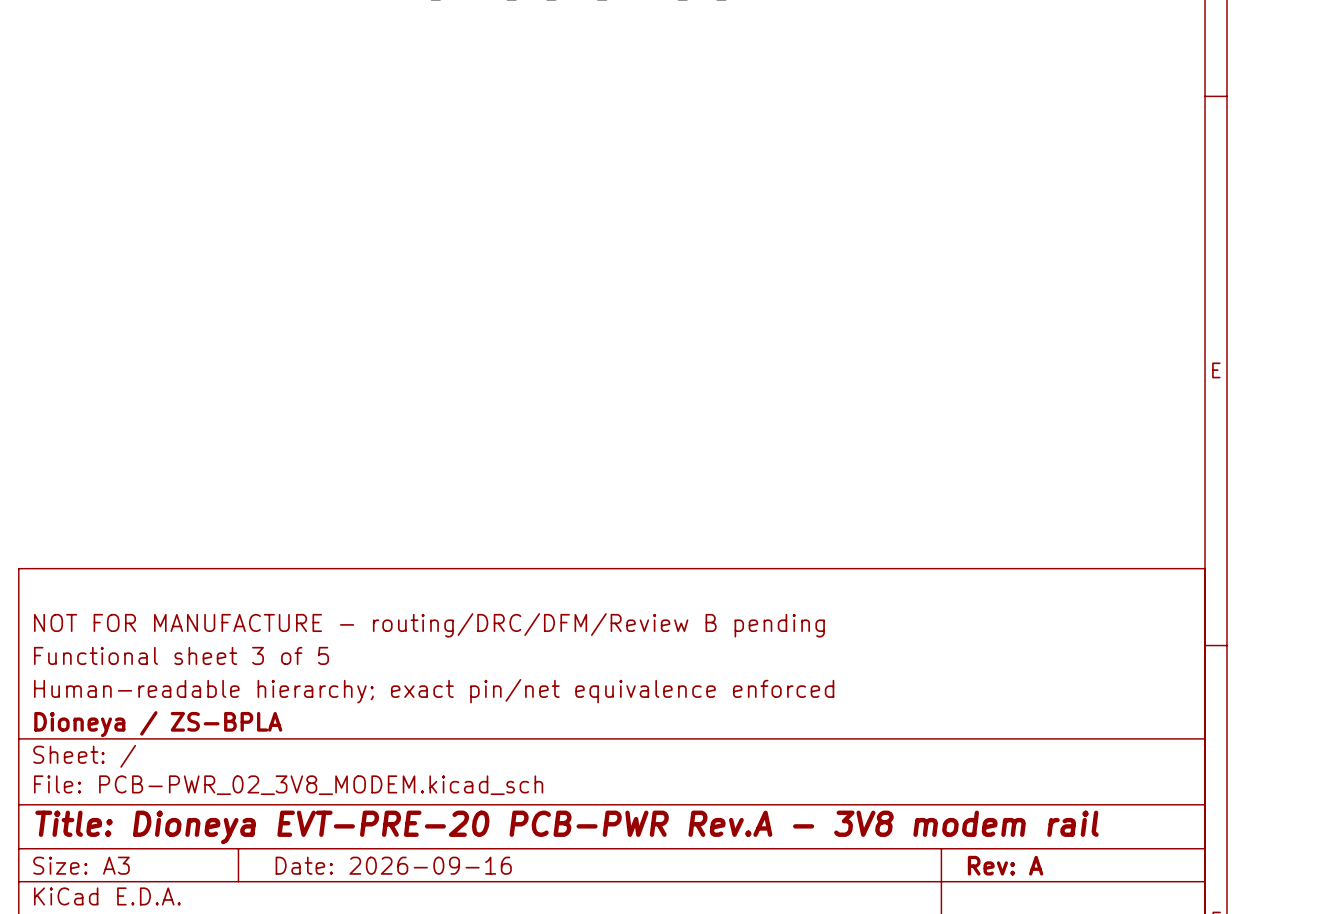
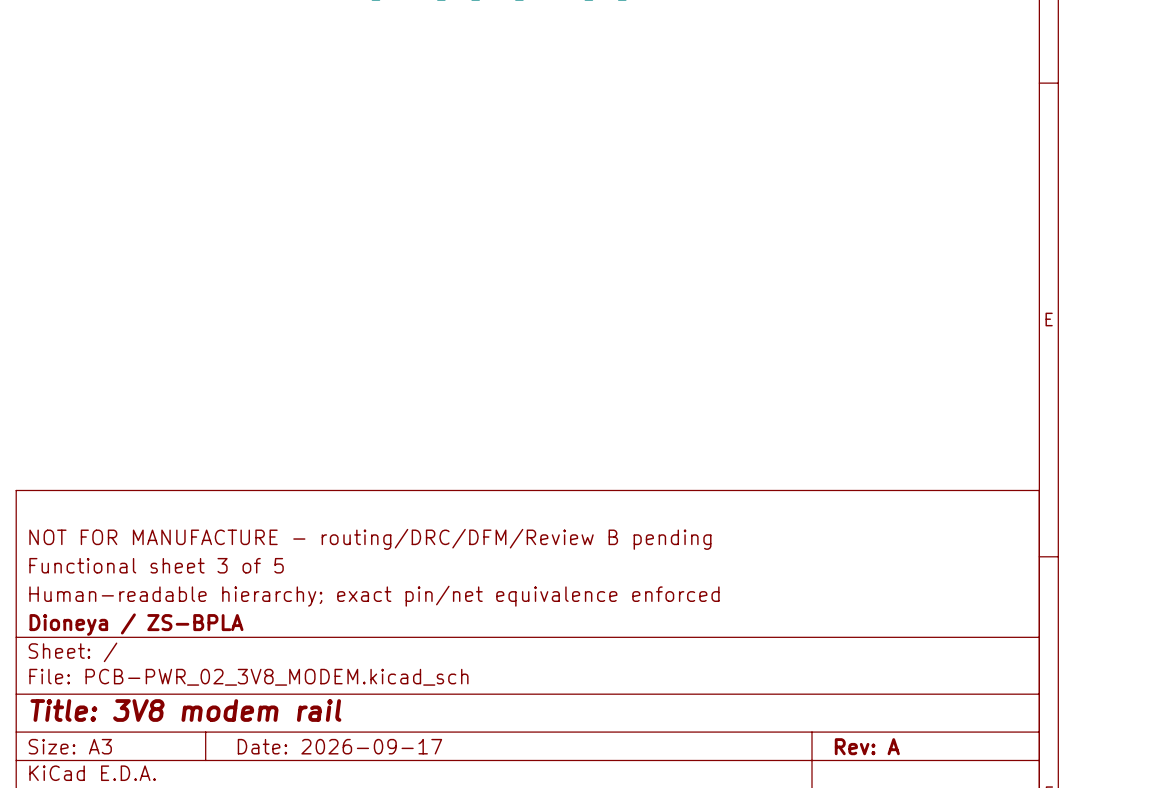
title block: Title: Dioneya EVT-PRE-20 PCB-PWR Rev.A - 3V8 modem rail (567, 827) -> Title: 3V8 modem rail (185, 710)
title block: Date: 2026-09-16 (393, 865) -> Date: 2026-09-17 (339, 746)

